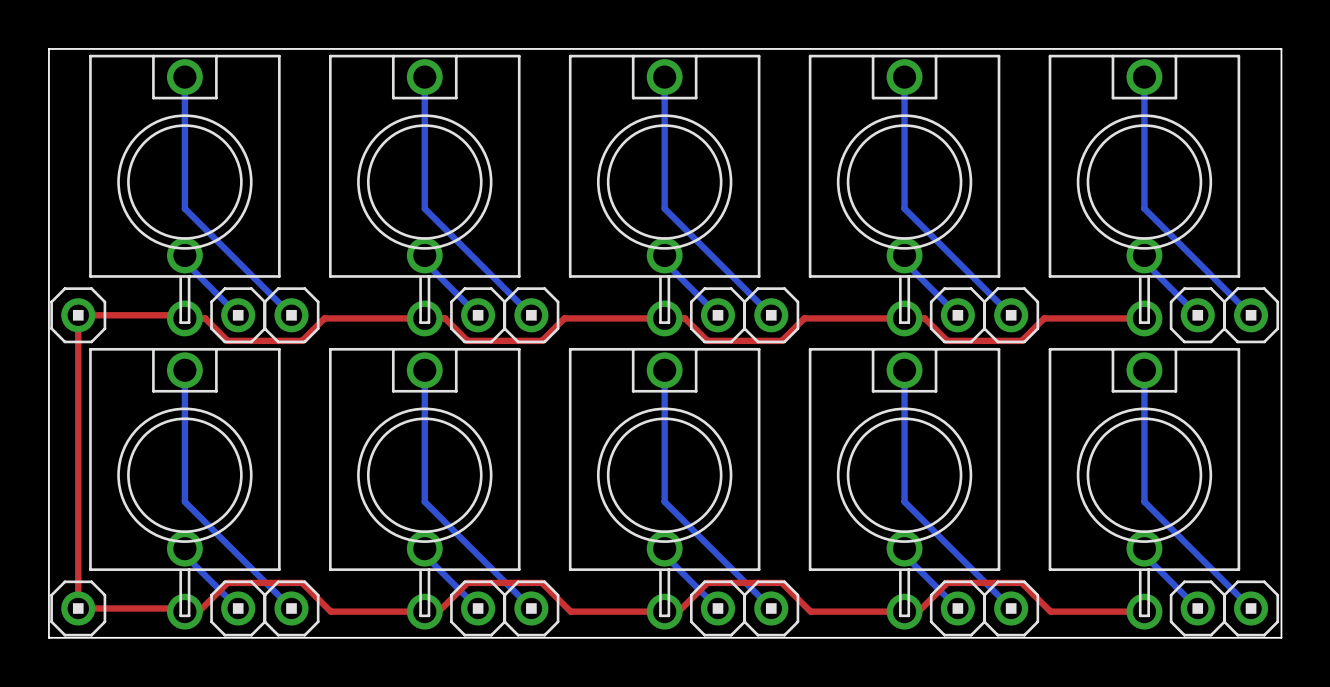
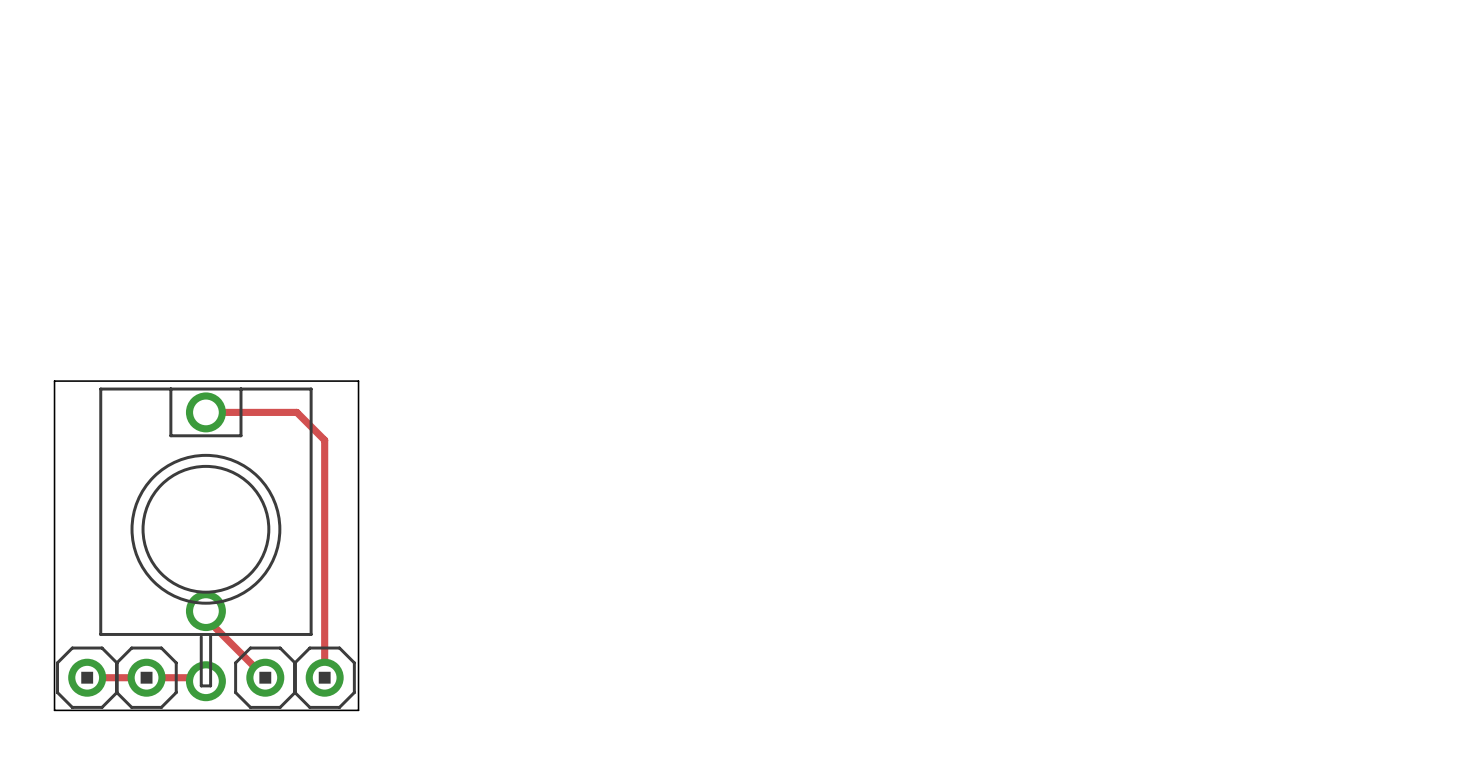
bottom track: (184, 77) (184, 208) (291, 315) -> none
bottom track: (424, 77) (424, 208) (531, 315) -> none
bottom track: (664, 77) (664, 208) (771, 315) -> none
bottom track: (904, 77) (904, 208) (1011, 315) -> none
bottom track: (1144, 77) (1144, 208) (1251, 315) -> none
part: (184, 195) -> none
part: (424, 195) -> none
part: (664, 195) -> none
part: (904, 195) -> none
part: (1144, 195) -> none
bottom track: (184, 255) (184, 261) (238, 315) -> none
bottom track: (424, 255) (424, 261) (478, 315) -> none
bottom track: (664, 255) (664, 261) (717, 315) -> none
bottom track: (904, 255) (904, 261) (957, 315) -> none
bottom track: (1144, 255) (1144, 261) (1197, 315) -> none
part: (78, 315) -> none
part: (238, 315) -> none
part: (291, 315) -> none
part: (478, 315) -> none
part: (531, 315) -> none
part: (717, 315) -> none
part: (771, 315) -> none
part: (957, 315) -> none
part: (1011, 315) -> none
part: (1197, 315) -> none
part: (1251, 315) -> none
top track: (1144, 318) (1044, 318) (1021, 340) (947, 340) (924, 318) (804, 318) (781, 340) (707, 340) (684, 318) (564, 318) (542, 340) (467, 340) (445, 318) (324, 318) (302, 340) (227, 340) (205, 318) (184, 318) (181, 315) (78, 315) (78, 608) -> none
board edge: (48, 342) (48, 48) (1281, 48) (1281, 637) (321, 637) -> (54, 381) (358, 381) (358, 710)
bottom track: (184, 370) (184, 501) (291, 608) -> none
top track: none -> (205, 412) (296, 412) (324, 440) (324, 677)
bottom track: (424, 370) (424, 501) (531, 608) -> none
bottom track: (664, 370) (664, 501) (771, 608) -> none
bottom track: (904, 370) (904, 501) (1011, 608) -> none
bottom track: (1144, 370) (1144, 501) (1251, 608) -> none
part: (424, 488) -> none
part: (664, 488) -> none
part: (904, 488) -> none
part: (1144, 488) -> none
bottom track: (184, 548) (184, 555) (238, 608) -> none
top track: none -> (205, 611) (205, 618) (265, 677)
bottom track: (424, 548) (424, 555) (478, 608) -> none
bottom track: (664, 548) (664, 555) (717, 608) -> none
bottom track: (904, 548) (904, 555) (957, 608) -> none
bottom track: (1144, 548) (1144, 555) (1197, 608) -> none
part: none -> (146, 677)
part: (478, 608) -> none
part: (531, 608) -> none
part: (717, 608) -> none
part: (771, 608) -> none
part: (957, 608) -> none
part: (1011, 608) -> none
part: (1197, 608) -> none
part: (1251, 608) -> none
top track: (184, 611) (198, 611) (227, 582) (302, 582) (330, 611) (438, 611) (467, 582) (542, 582) (570, 611) (678, 611) (707, 582) (781, 582) (810, 611) (918, 611) (947, 582) (1021, 582) (1050, 611) (1144, 611) -> none

